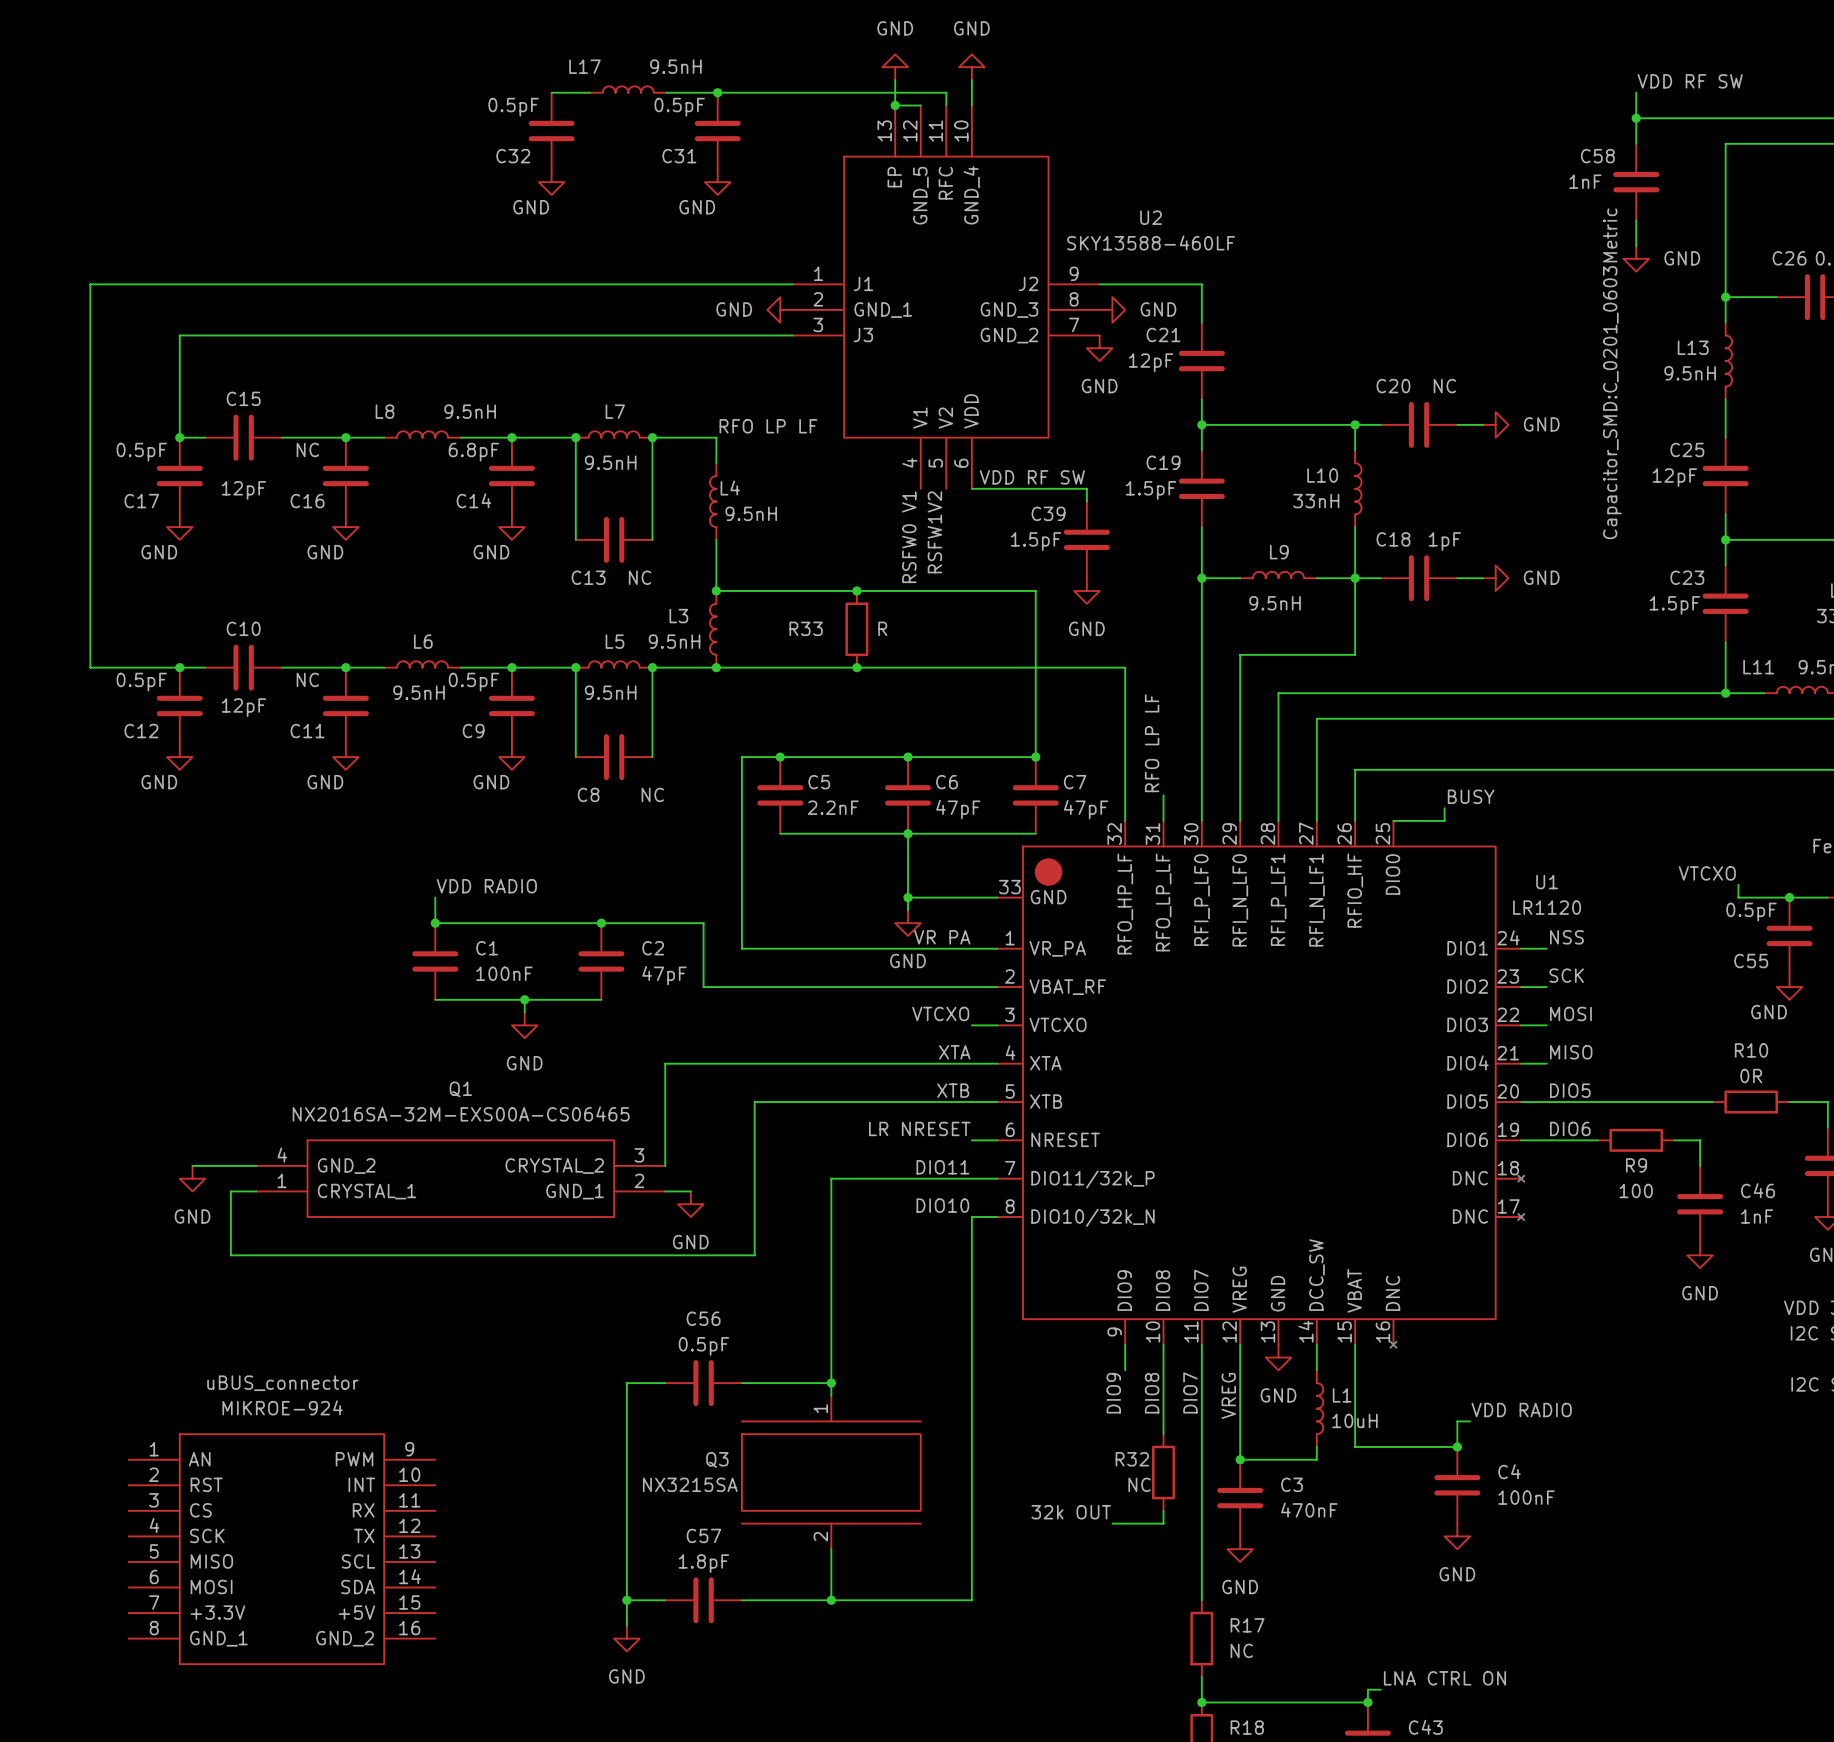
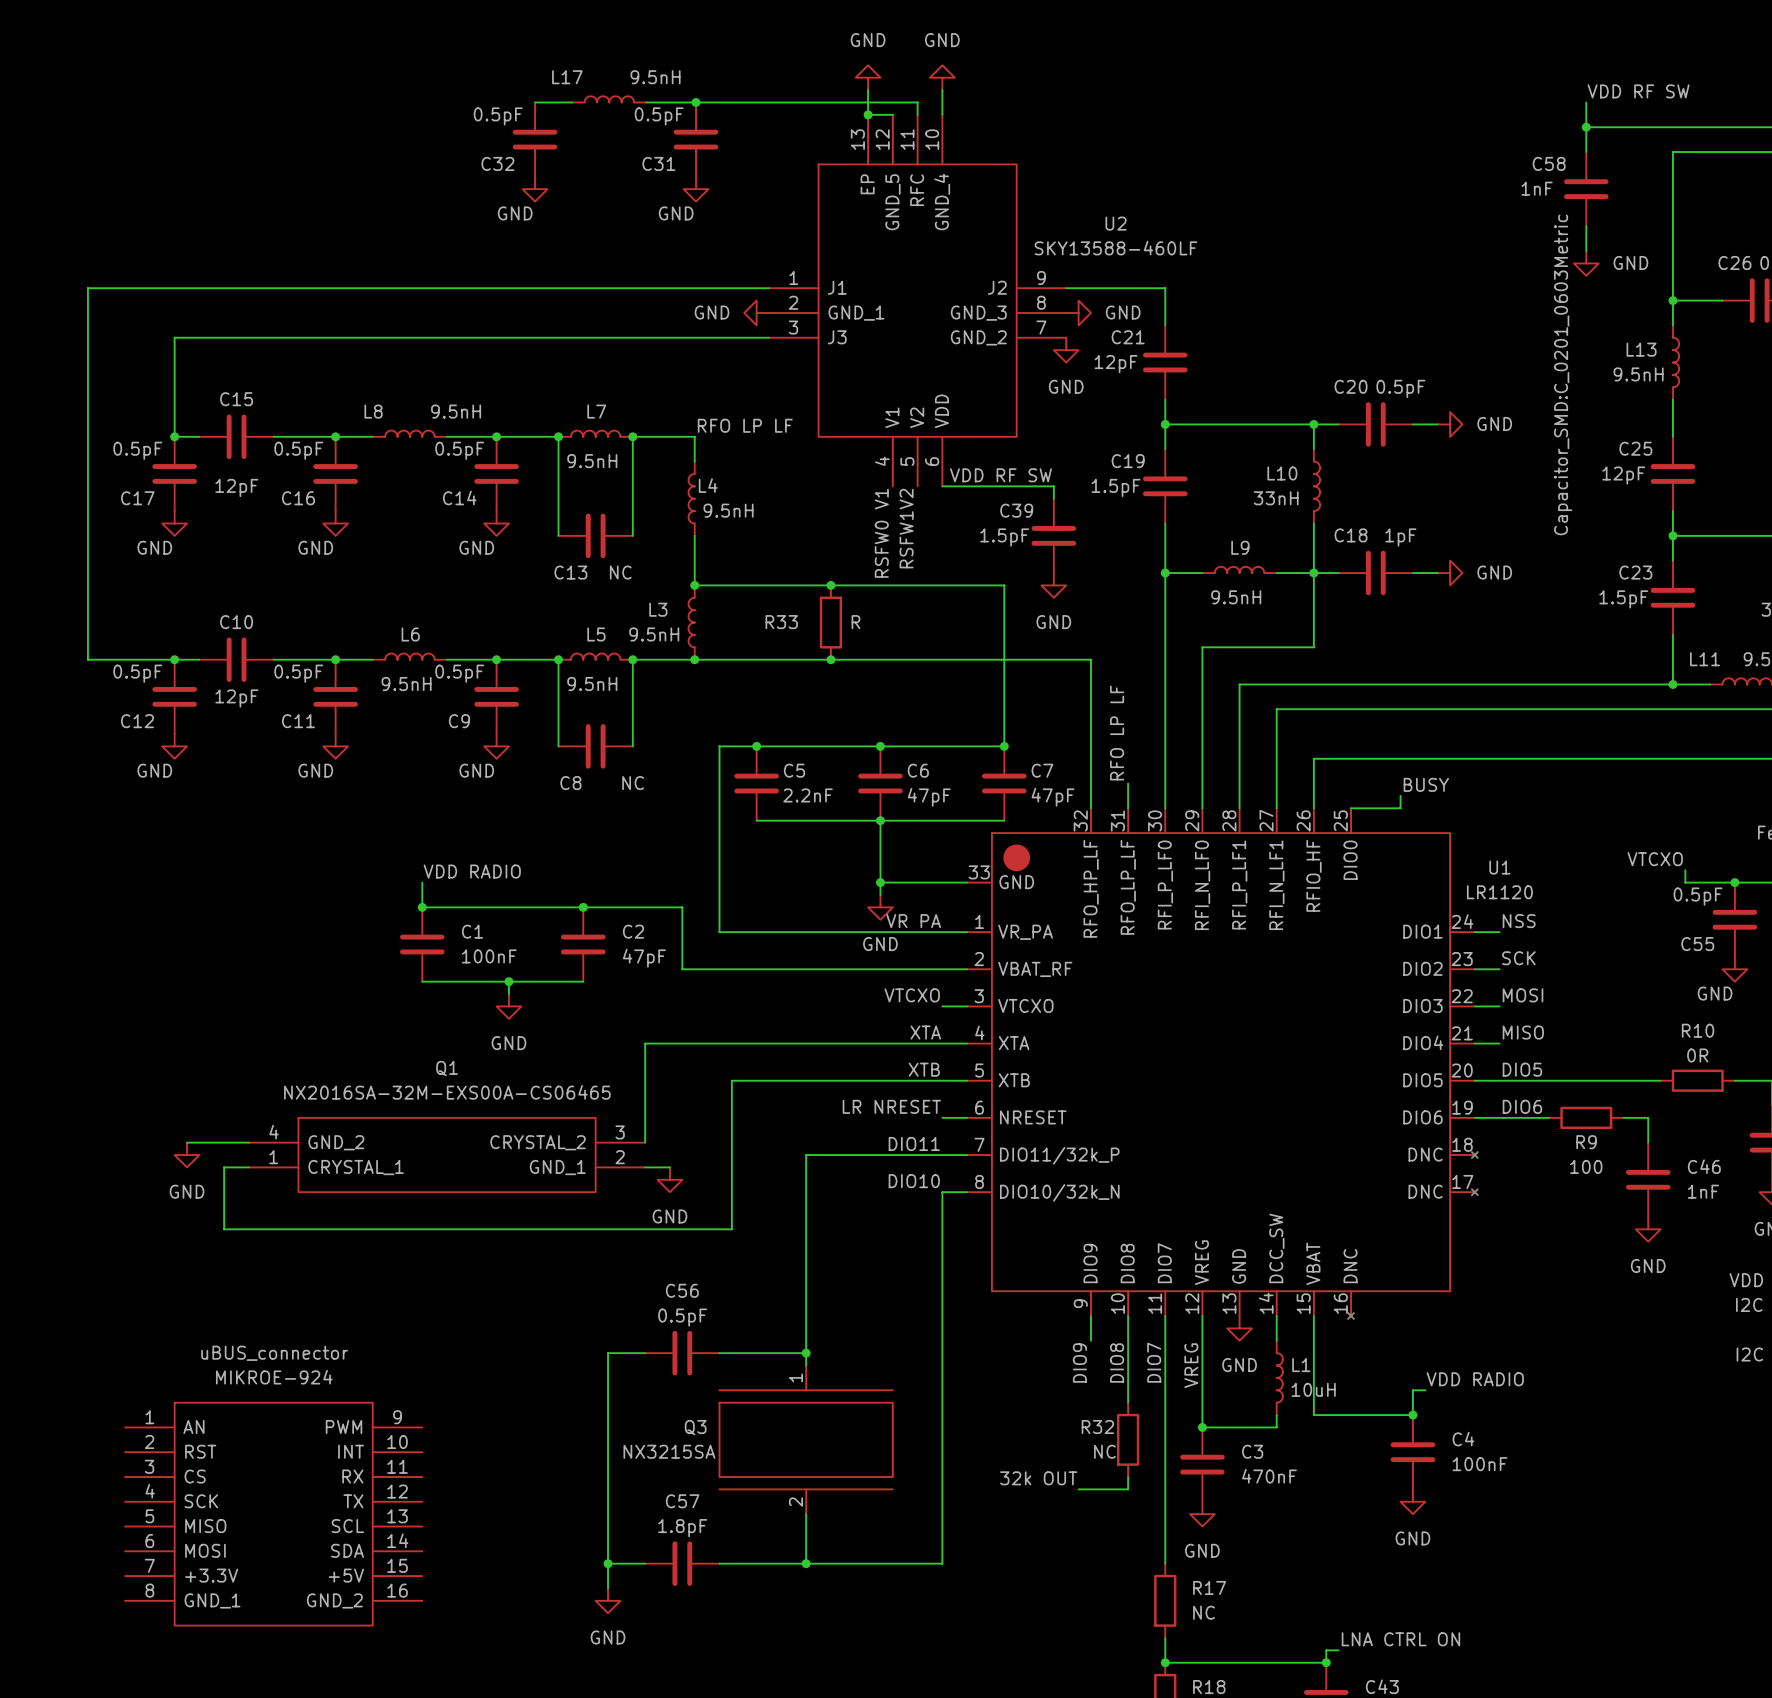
C20 value: NC (1444, 386) -> 0.5pF (1400, 388)
C16 value: NC (307, 449) -> 0.5pF (298, 450)
C14 value: 6.8pF (473, 452) -> 0.5pF (459, 450)
C11 value: NC (307, 679) -> 0.5pF (298, 673)

